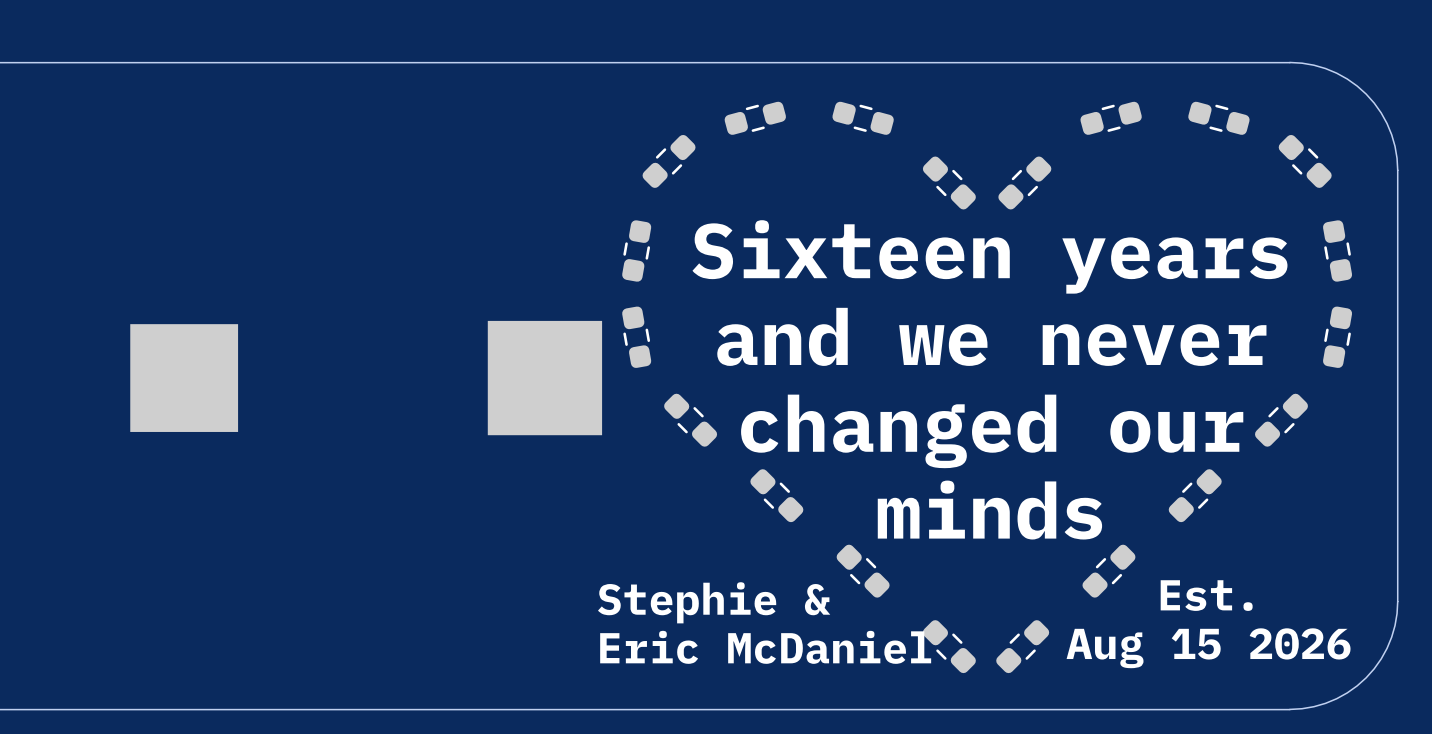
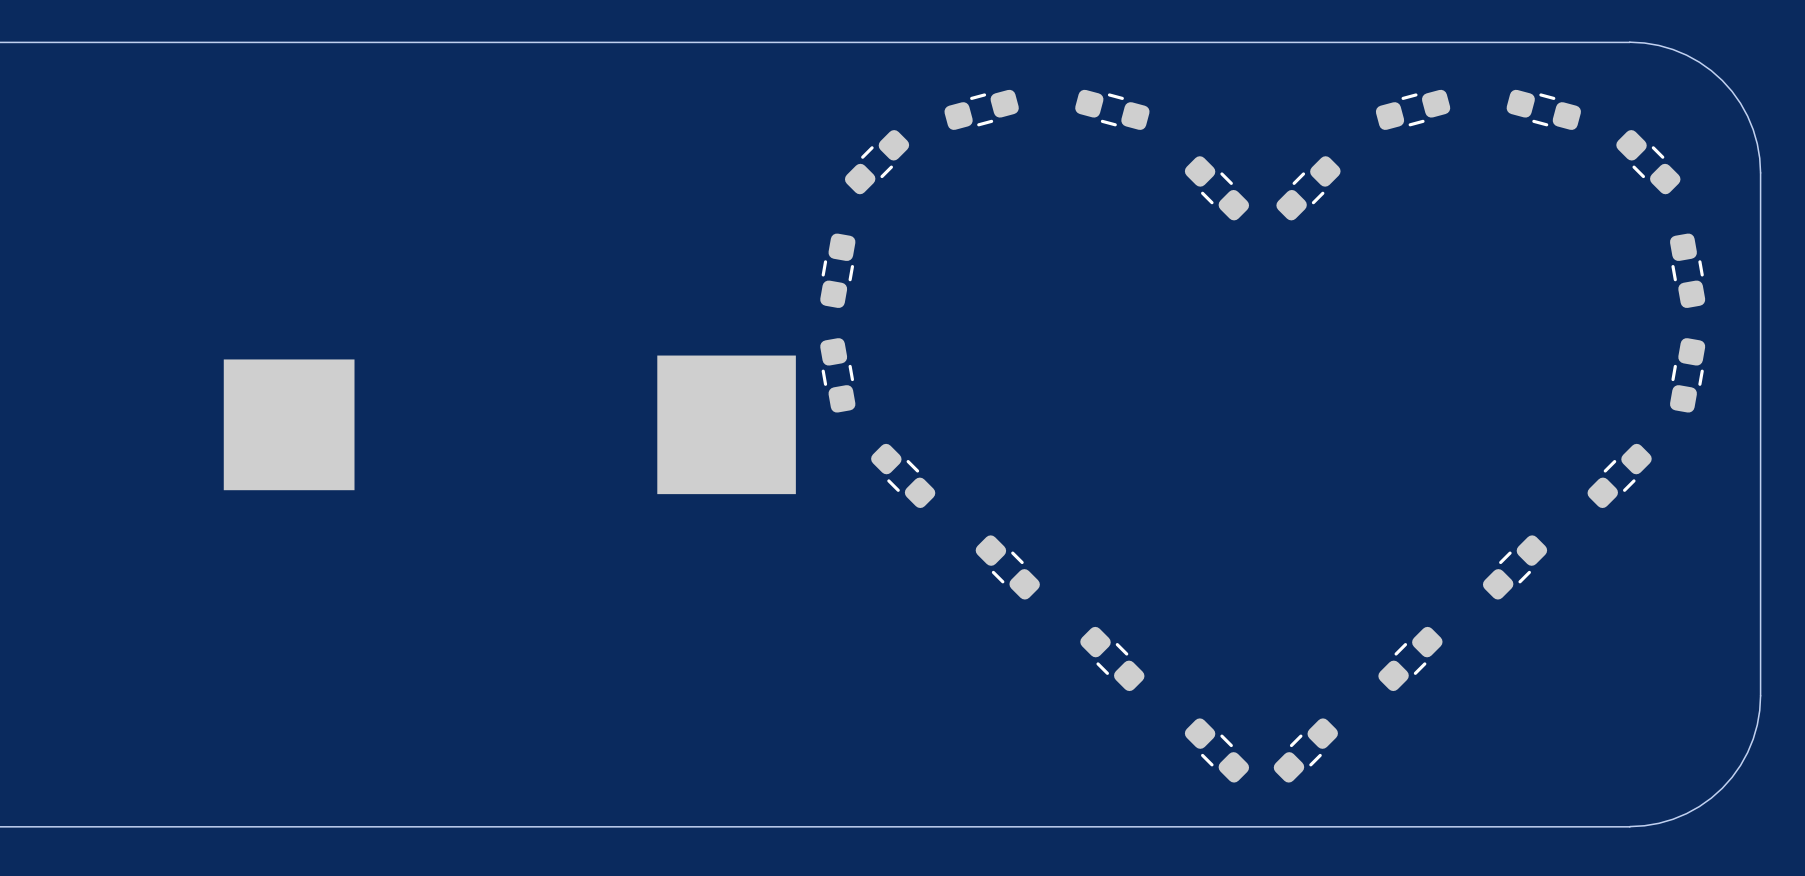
text: Sixteen years (989, 256) -> none
text: and we never (991, 336) -> none
text: changed our (992, 431) -> none
text: minds (989, 510) -> none
text: Est. (1206, 595) -> none
text: Stephie & (714, 602) -> none
text: Eric McDaniel (765, 647) -> none
text: Aug 15 2026 (1208, 648) -> none

